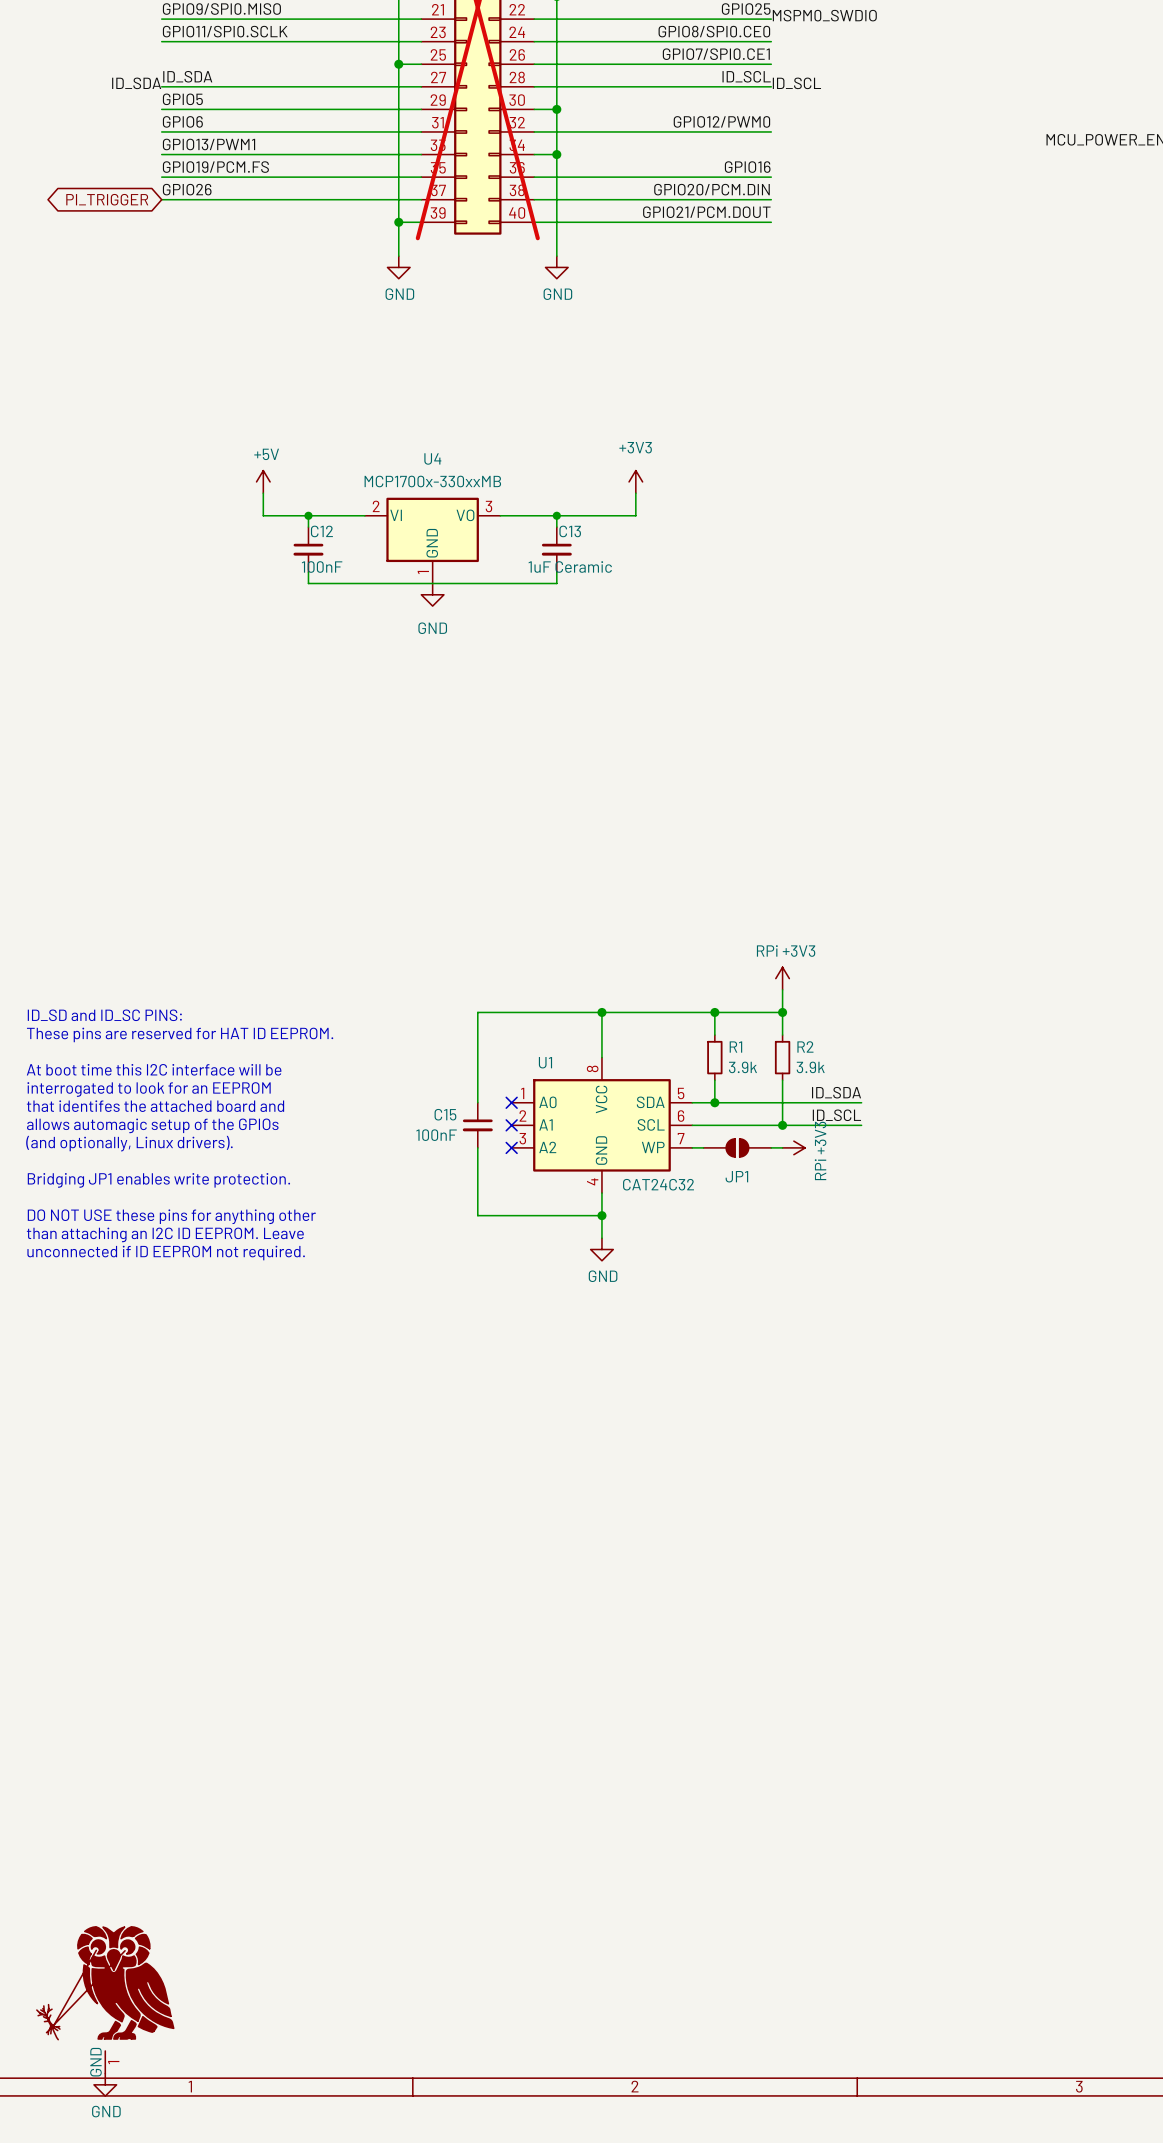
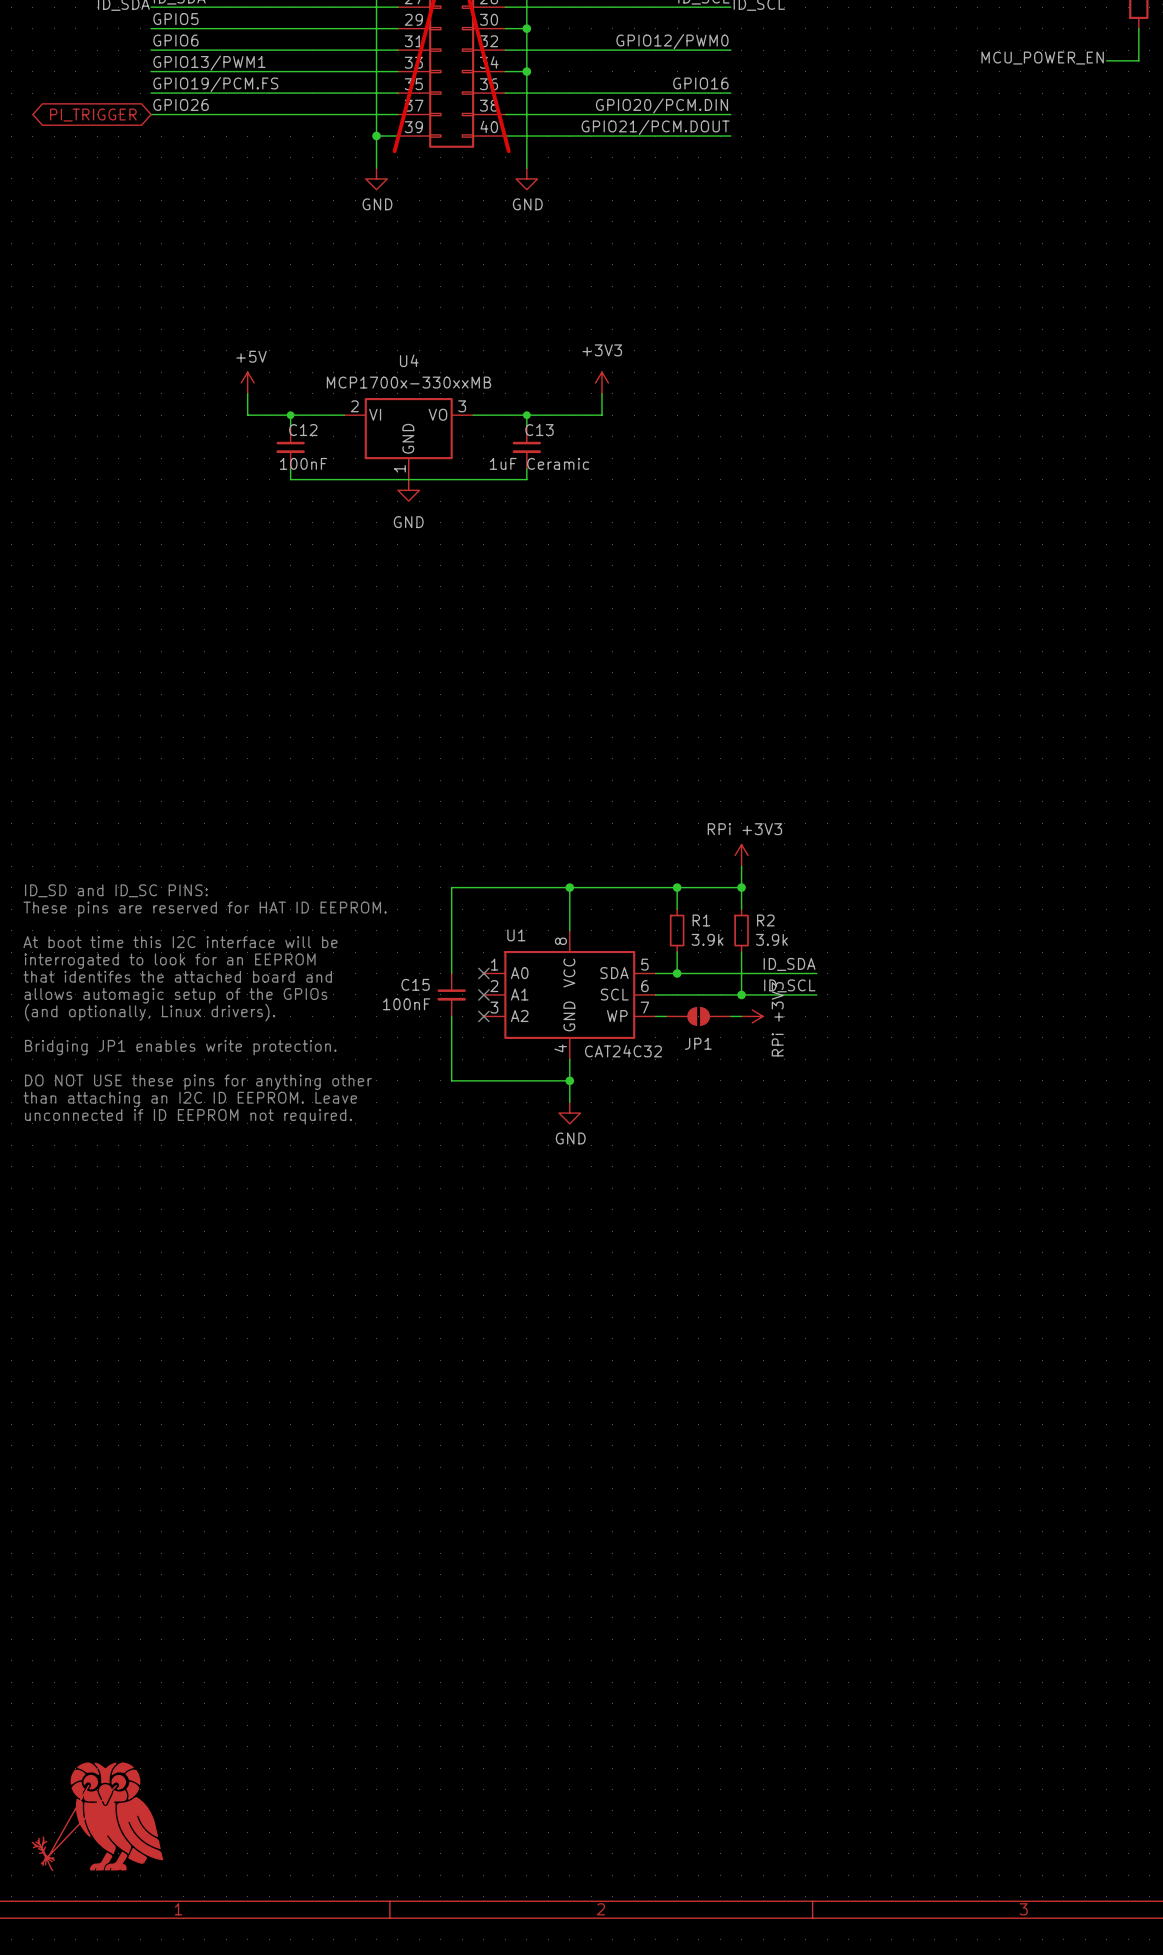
part: none -> (97, 1816)
part: (105, 2000) -> none
power symbol: GND (105, 2084) -> none

